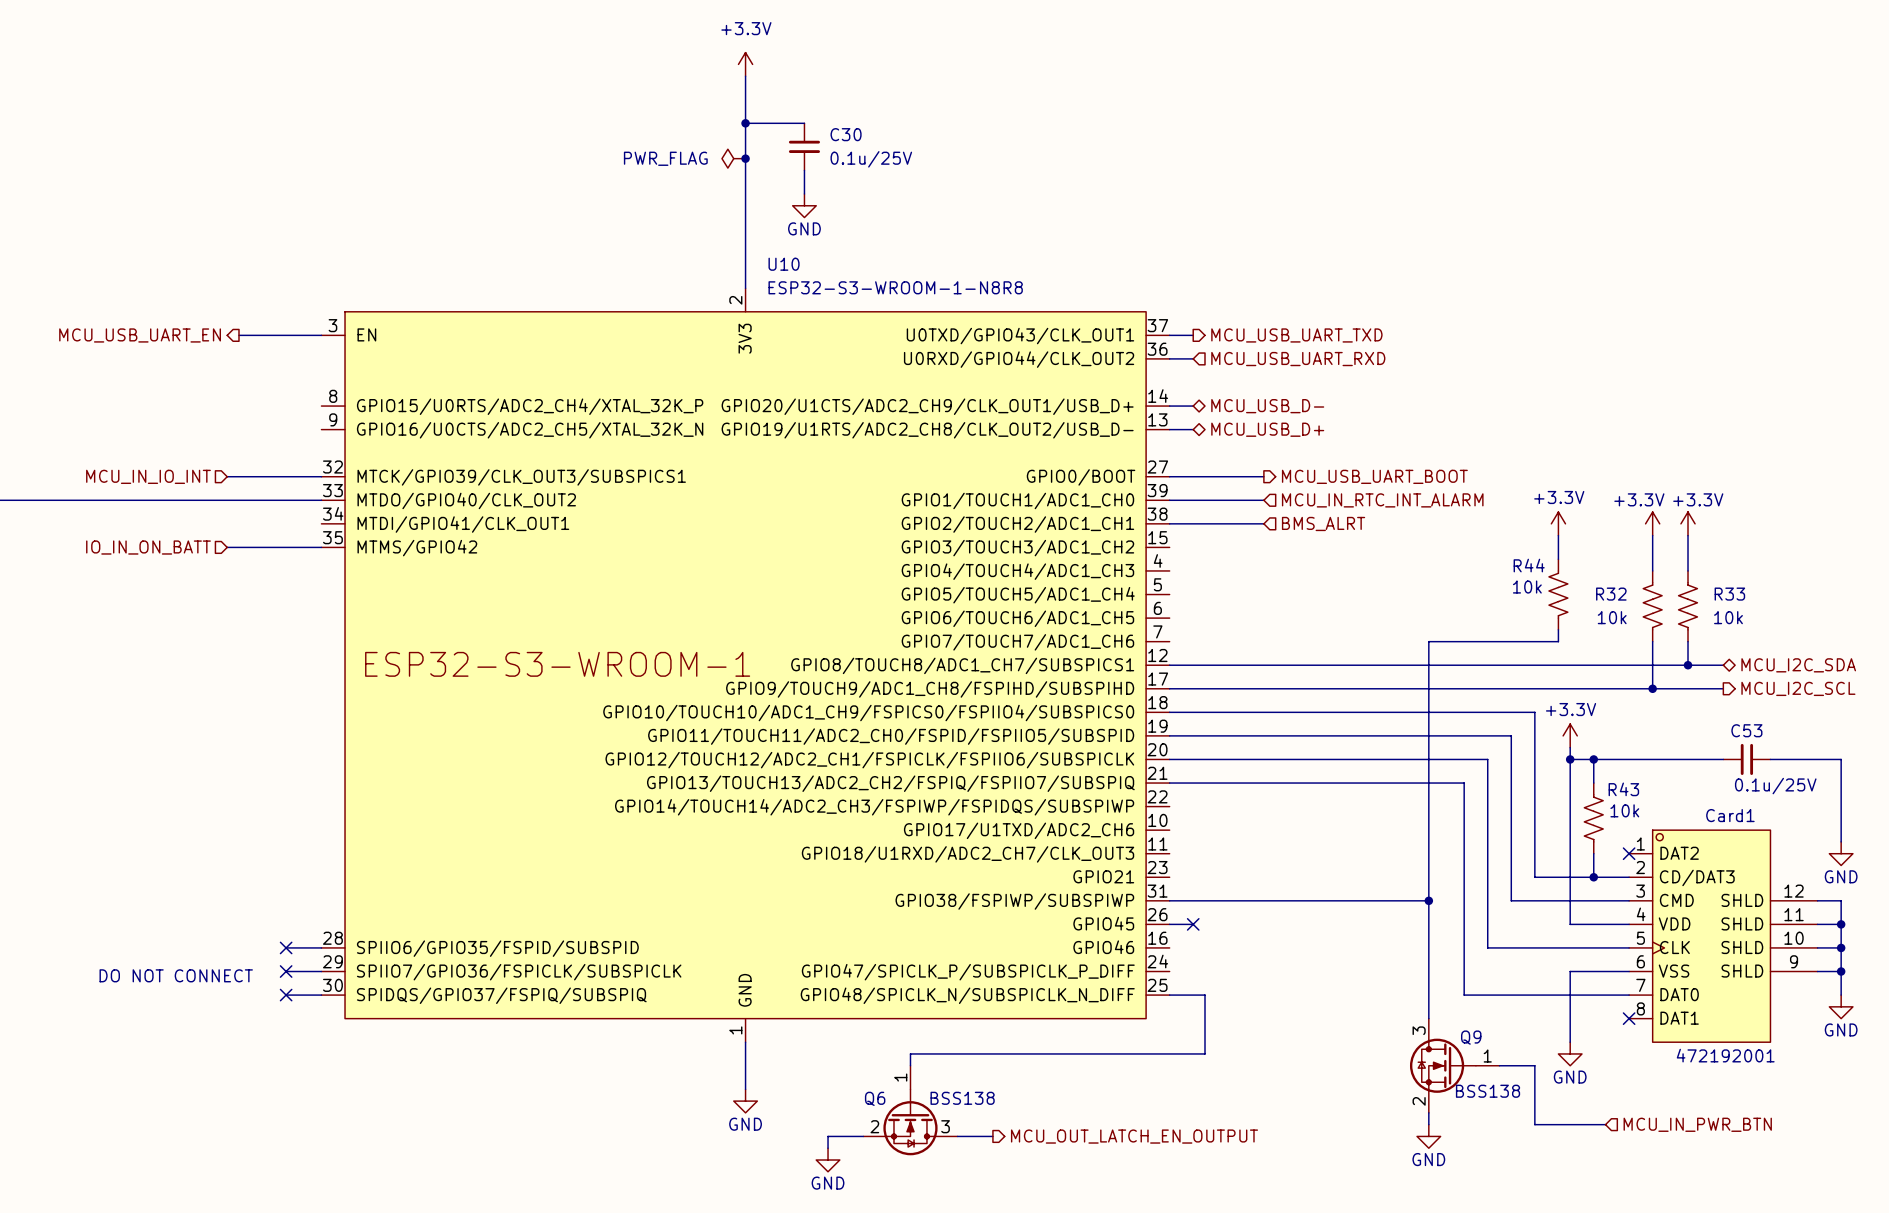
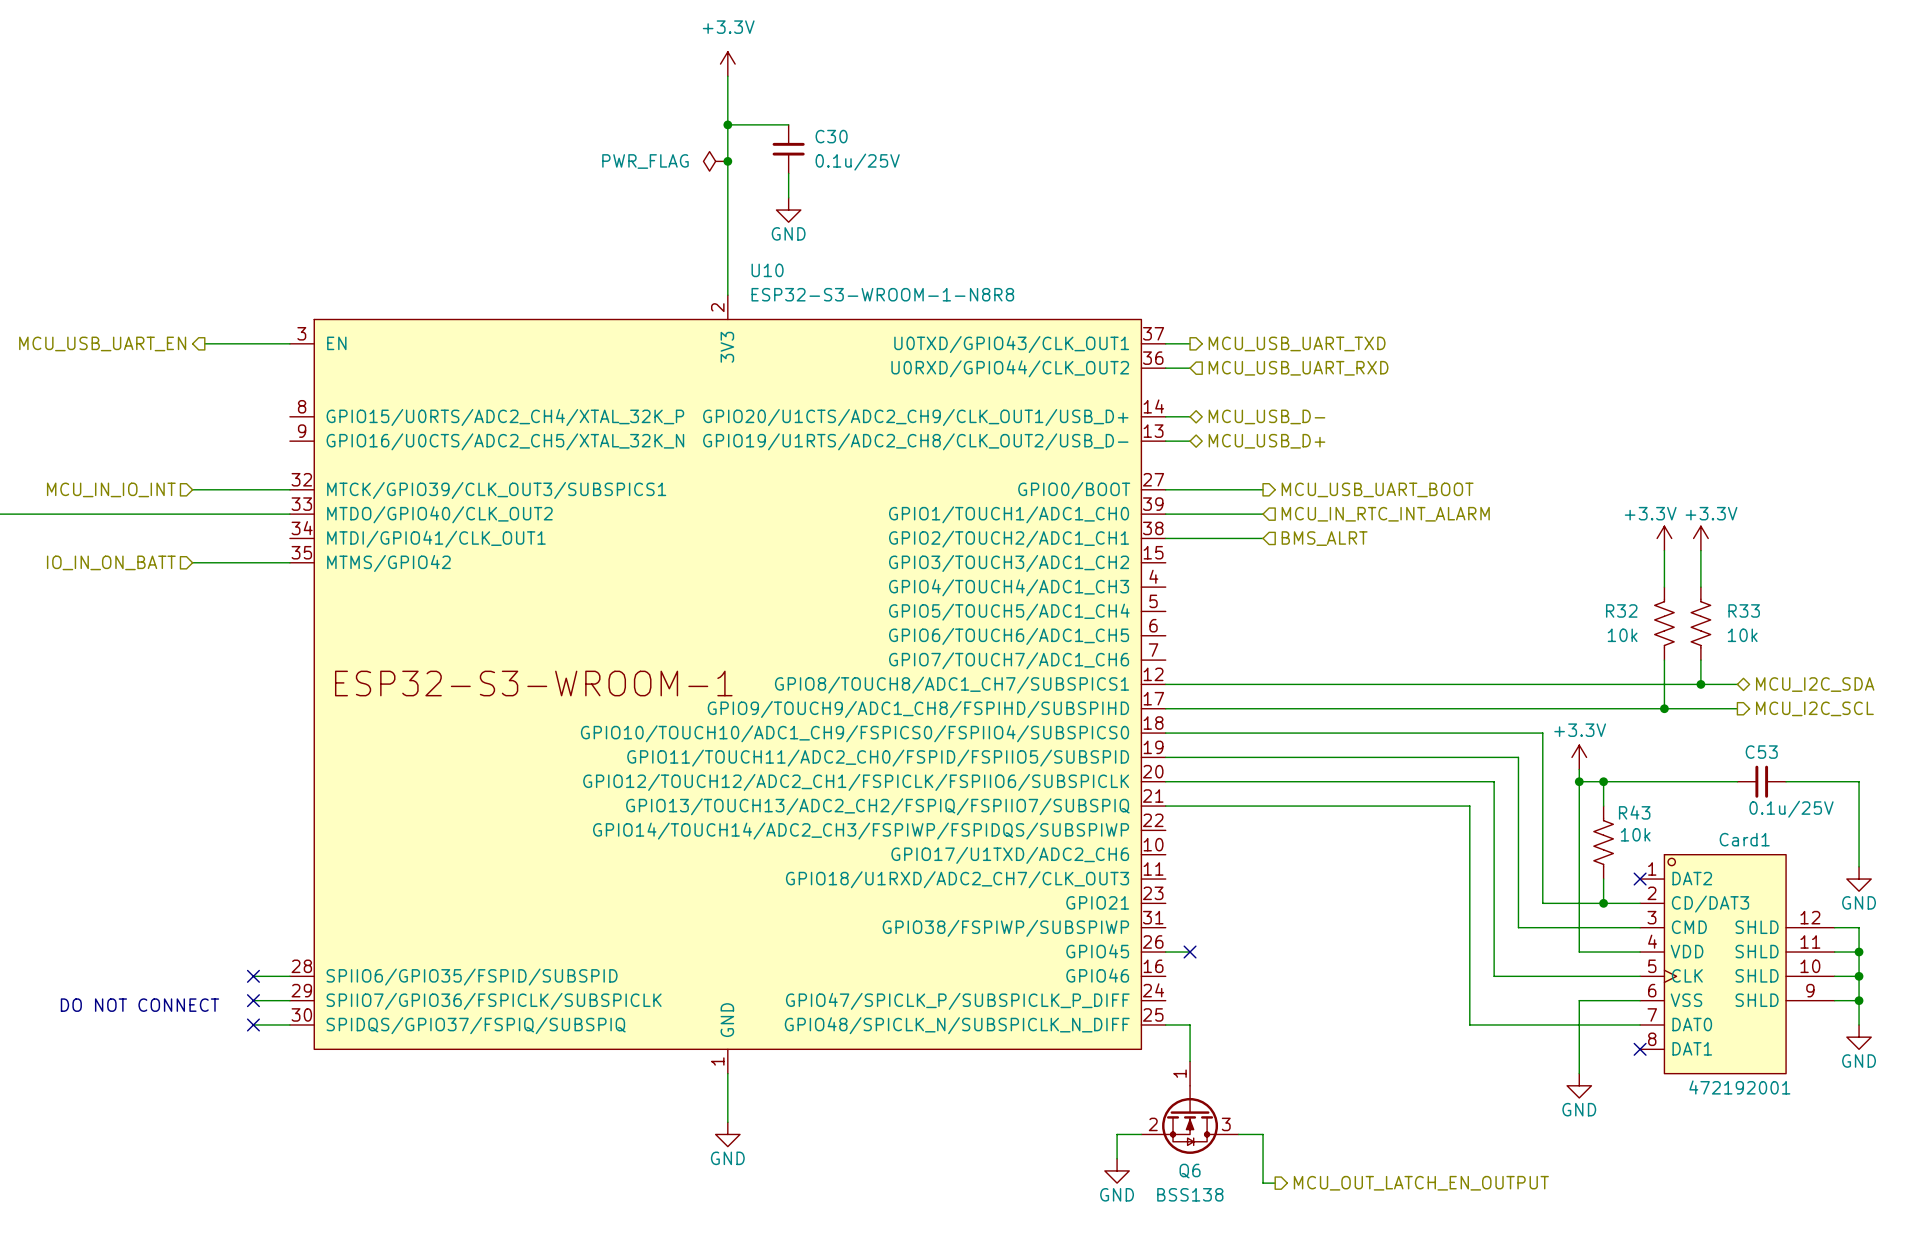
power symbol: +3.3V (1558, 523) -> none
wire: (1558, 535) (1558, 559) -> none
R44: 10k (1558, 594) -> none
wire: (1558, 629) (1558, 641) (1428, 641) (1428, 1018) -> none
wire: (1169, 900) (1428, 900) -> none
junction: (1428, 900) -> none
wire: (1193, 995) (1205, 995) (1205, 1053) (910, 1053) (910, 1065) -> (1190, 1024) (1190, 1061)
Q9: BSS138 (1454, 1065) -> none
wire: (1499, 1065) (1534, 1065) (1534, 1124) (1605, 1124) -> none
Q6 name position: Q6 (875, 1098) -> Q6 (1190, 1171)
Q6 value position: BSS138 (962, 1098) -> BSS138 (1190, 1194)
wire: none -> (1141, 1134) (1117, 1134) (1117, 1158)
wire: none -> (1238, 1134) (1263, 1134) (1263, 1183) (1275, 1183)
Q6 position: (910, 1110) -> (1190, 1107)
wire: (1428, 1112) (1428, 1124) -> none
hierarchical label: MCU_IN_PWR_BTN (1697, 1124) -> none
wire: (863, 1136) (828, 1136) (828, 1148) -> none
wire: (957, 1136) (992, 1136) -> none
power symbol: none -> GND (1117, 1170)
hierarchical label: MCU_OUT_LATCH_EN_OUTPUT (1134, 1136) -> none
power symbol: GND (1428, 1136) -> none
hierarchical label: none -> MCU_OUT_LATCH_EN_OUTPUT (1421, 1183)
power symbol: GND (828, 1160) -> none

